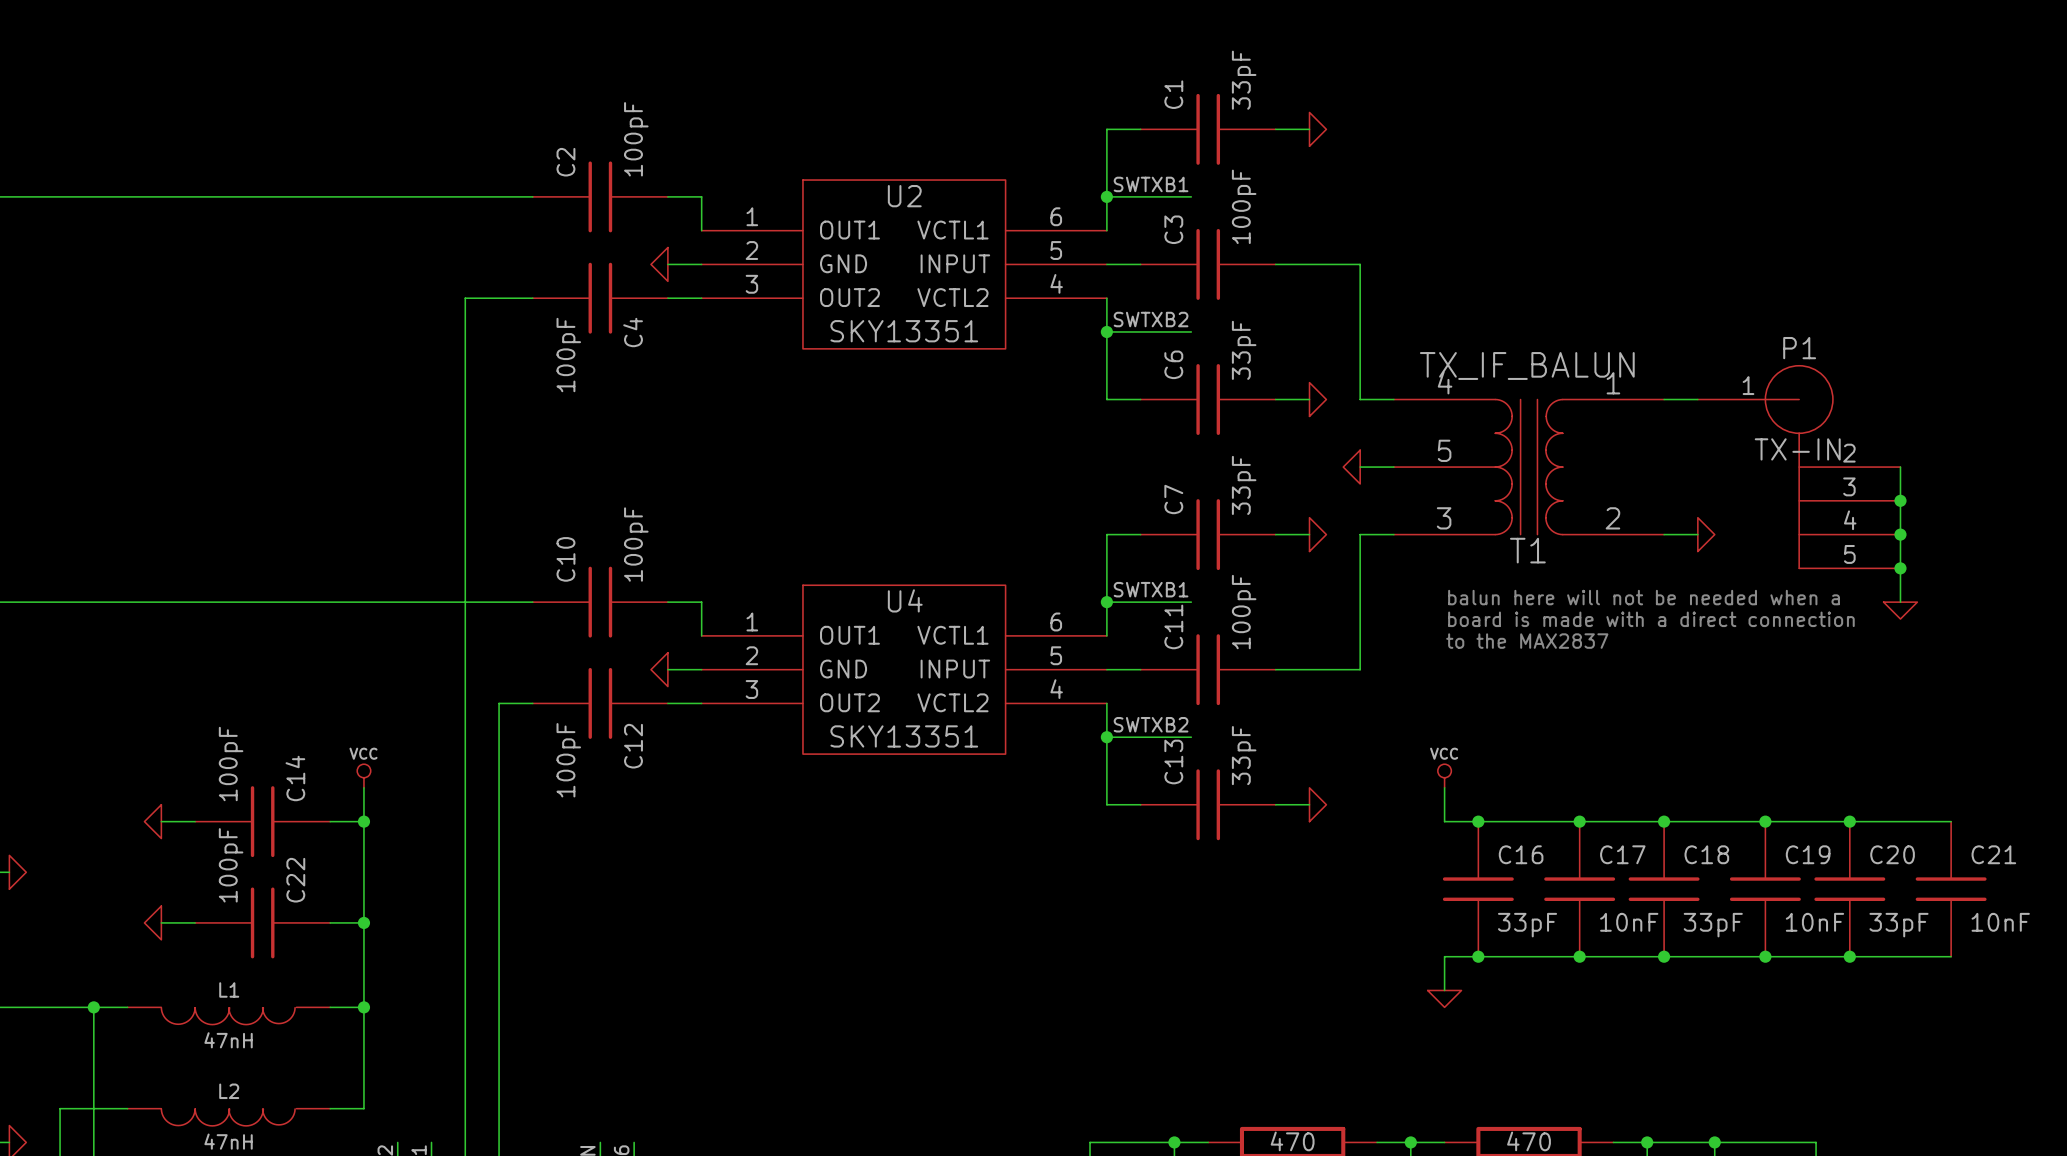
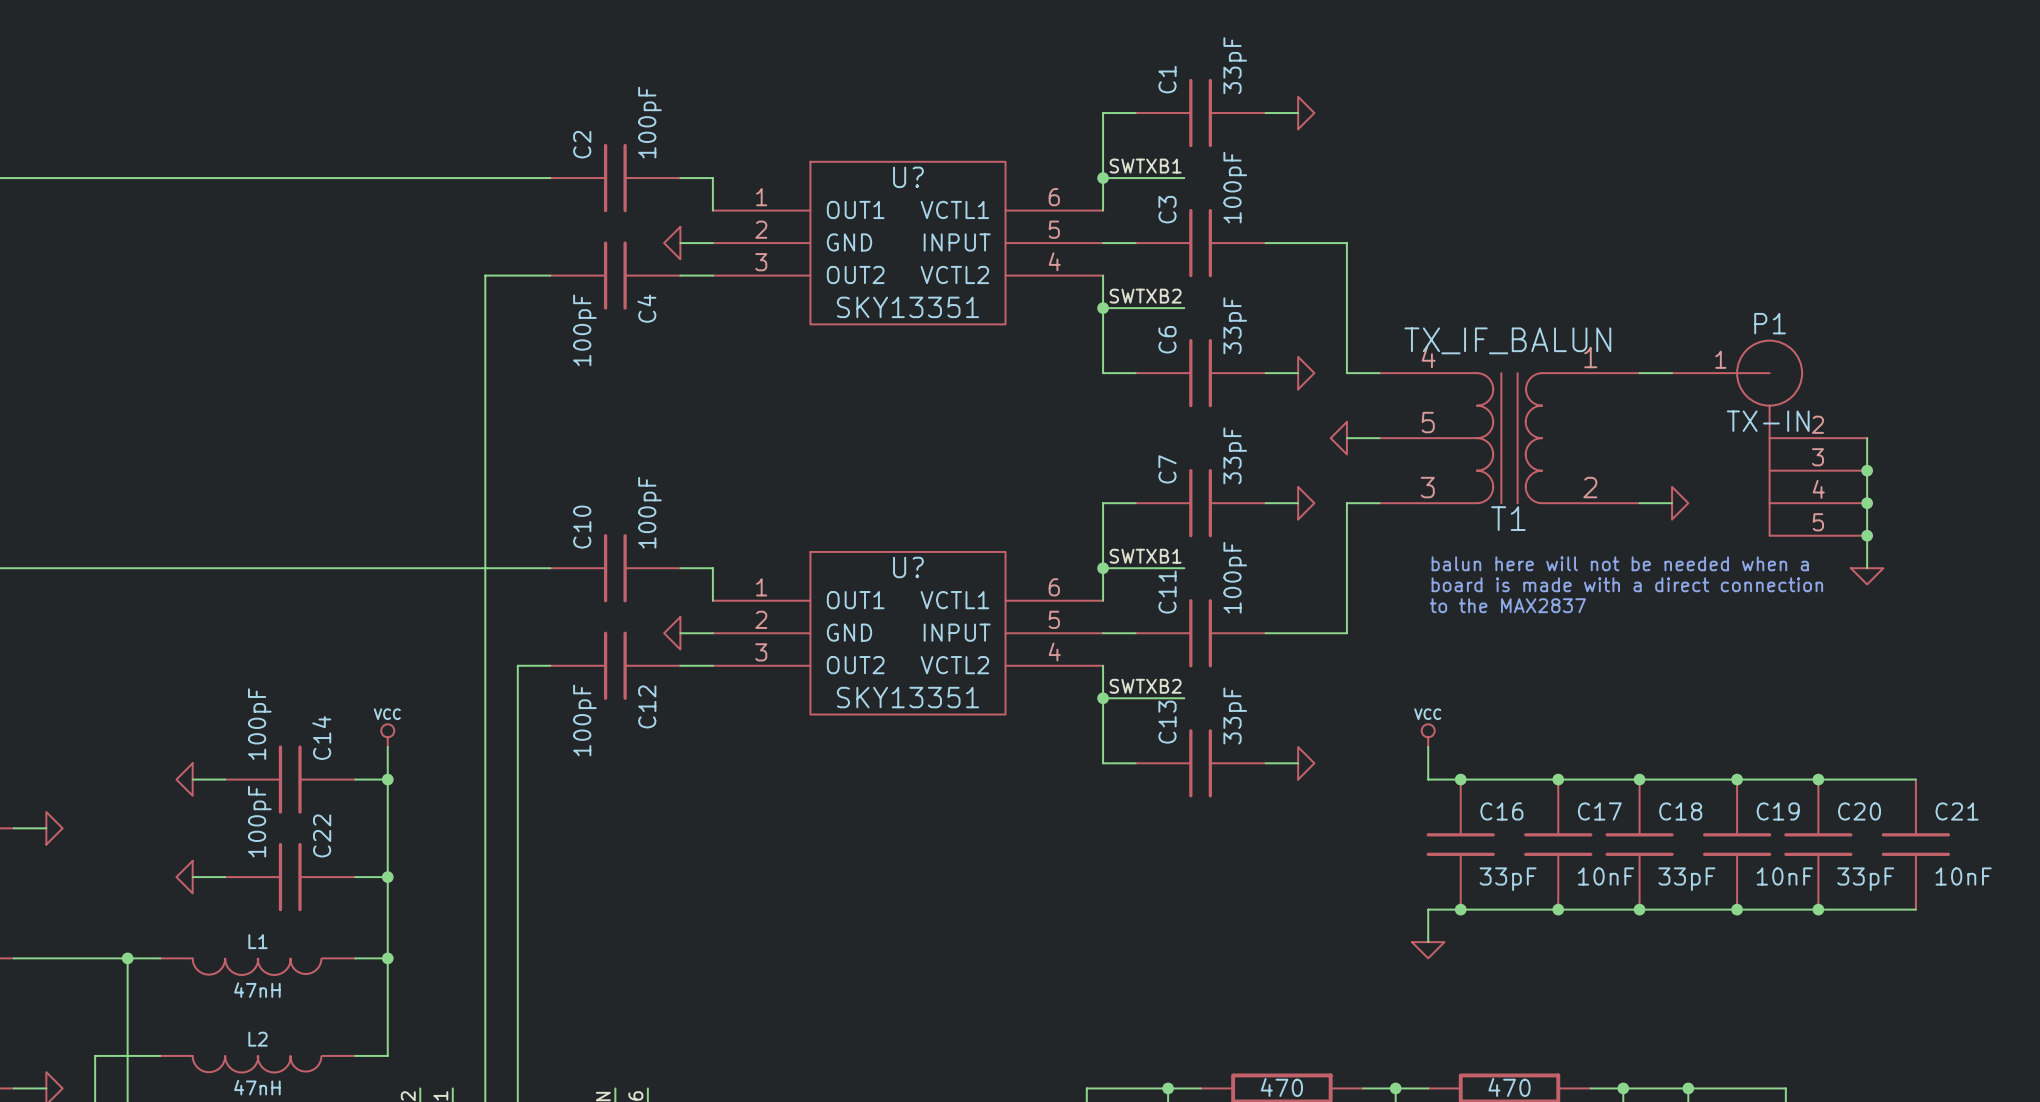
U2 name: U2 (904, 196) -> U? (908, 177)
U4 name: U4 (905, 600) -> U? (908, 567)

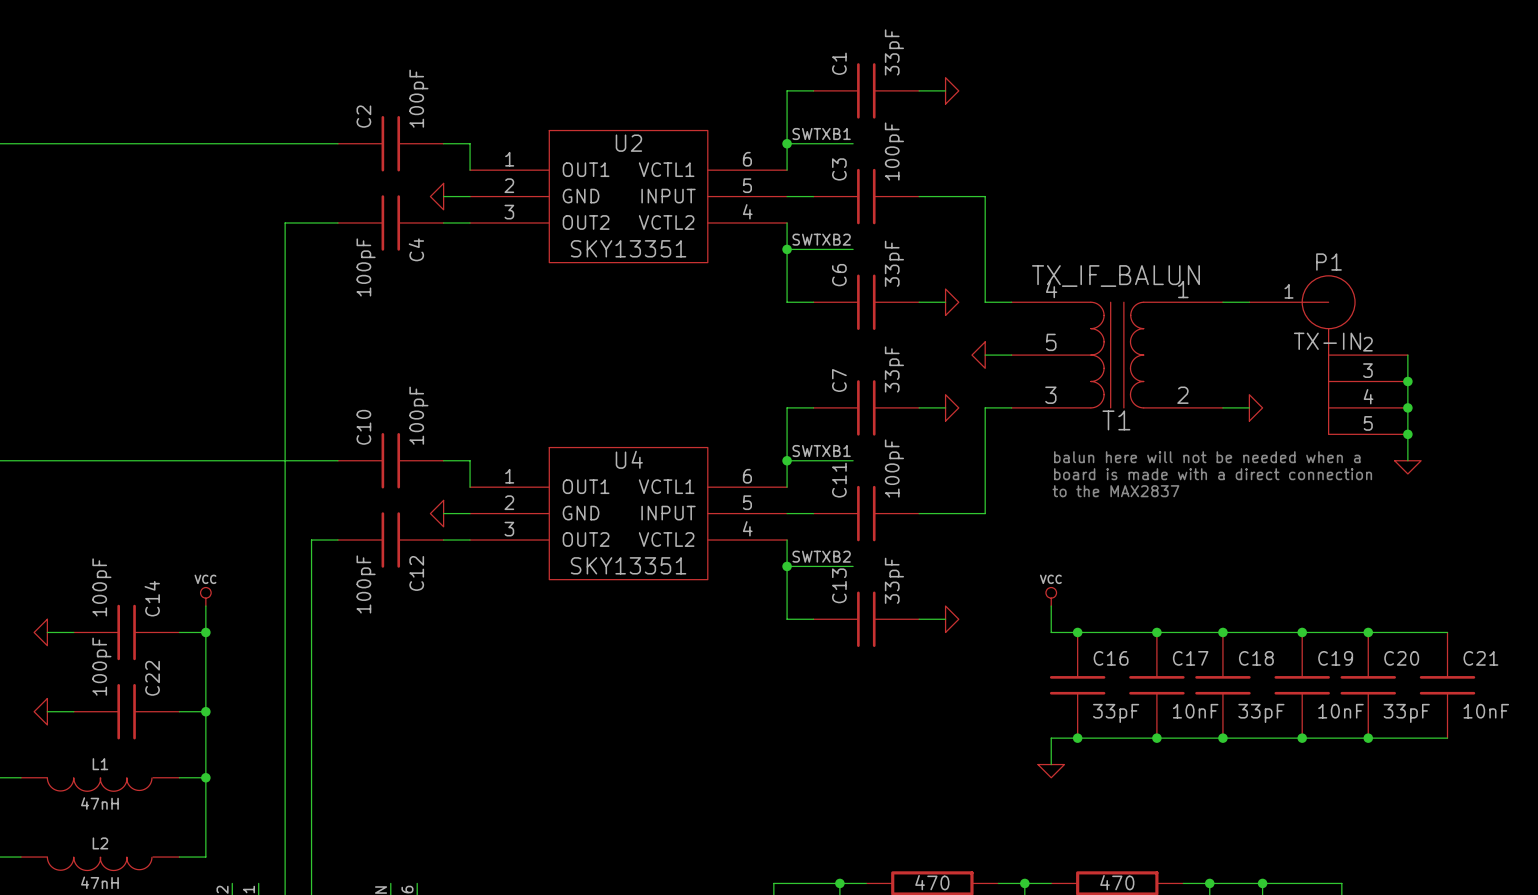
U? name: U? (908, 177) -> U2 (628, 143)
U? name: U? (908, 567) -> U4 (629, 459)

